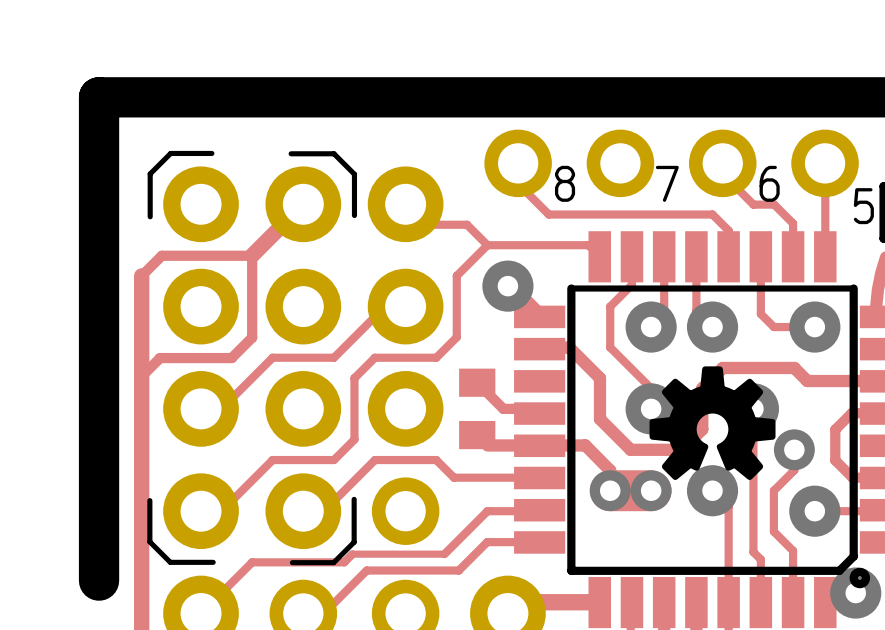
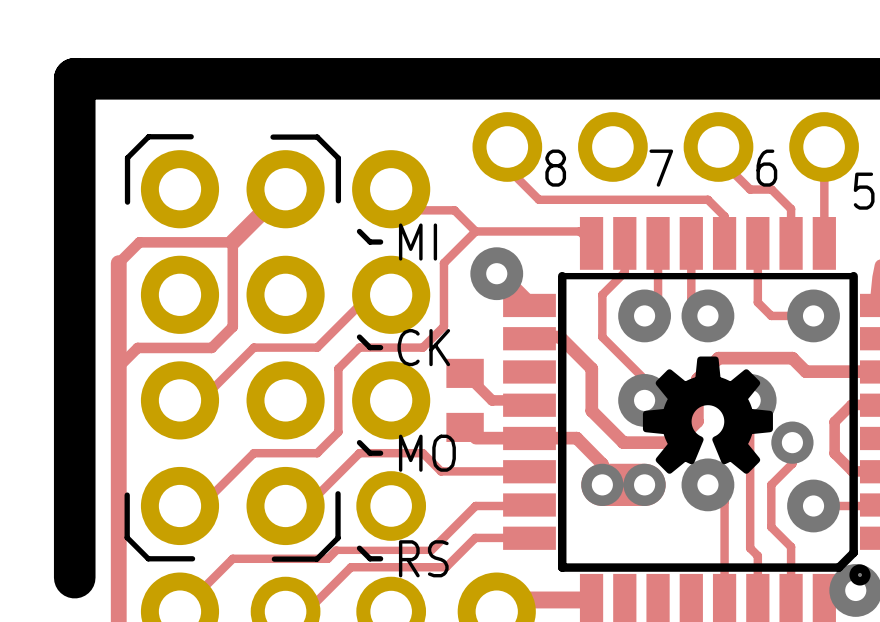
line: none -> (359, 231) (370, 242) (380, 242)
text: none -> MI (418, 242)
line: none -> (359, 337) (370, 347) (380, 347)
text: none -> CK (423, 347)
line: none -> (359, 442) (370, 453) (380, 453)
text: none -> MO (427, 453)
line: none -> (359, 548) (370, 558) (380, 558)
text: none -> RS (423, 558)

